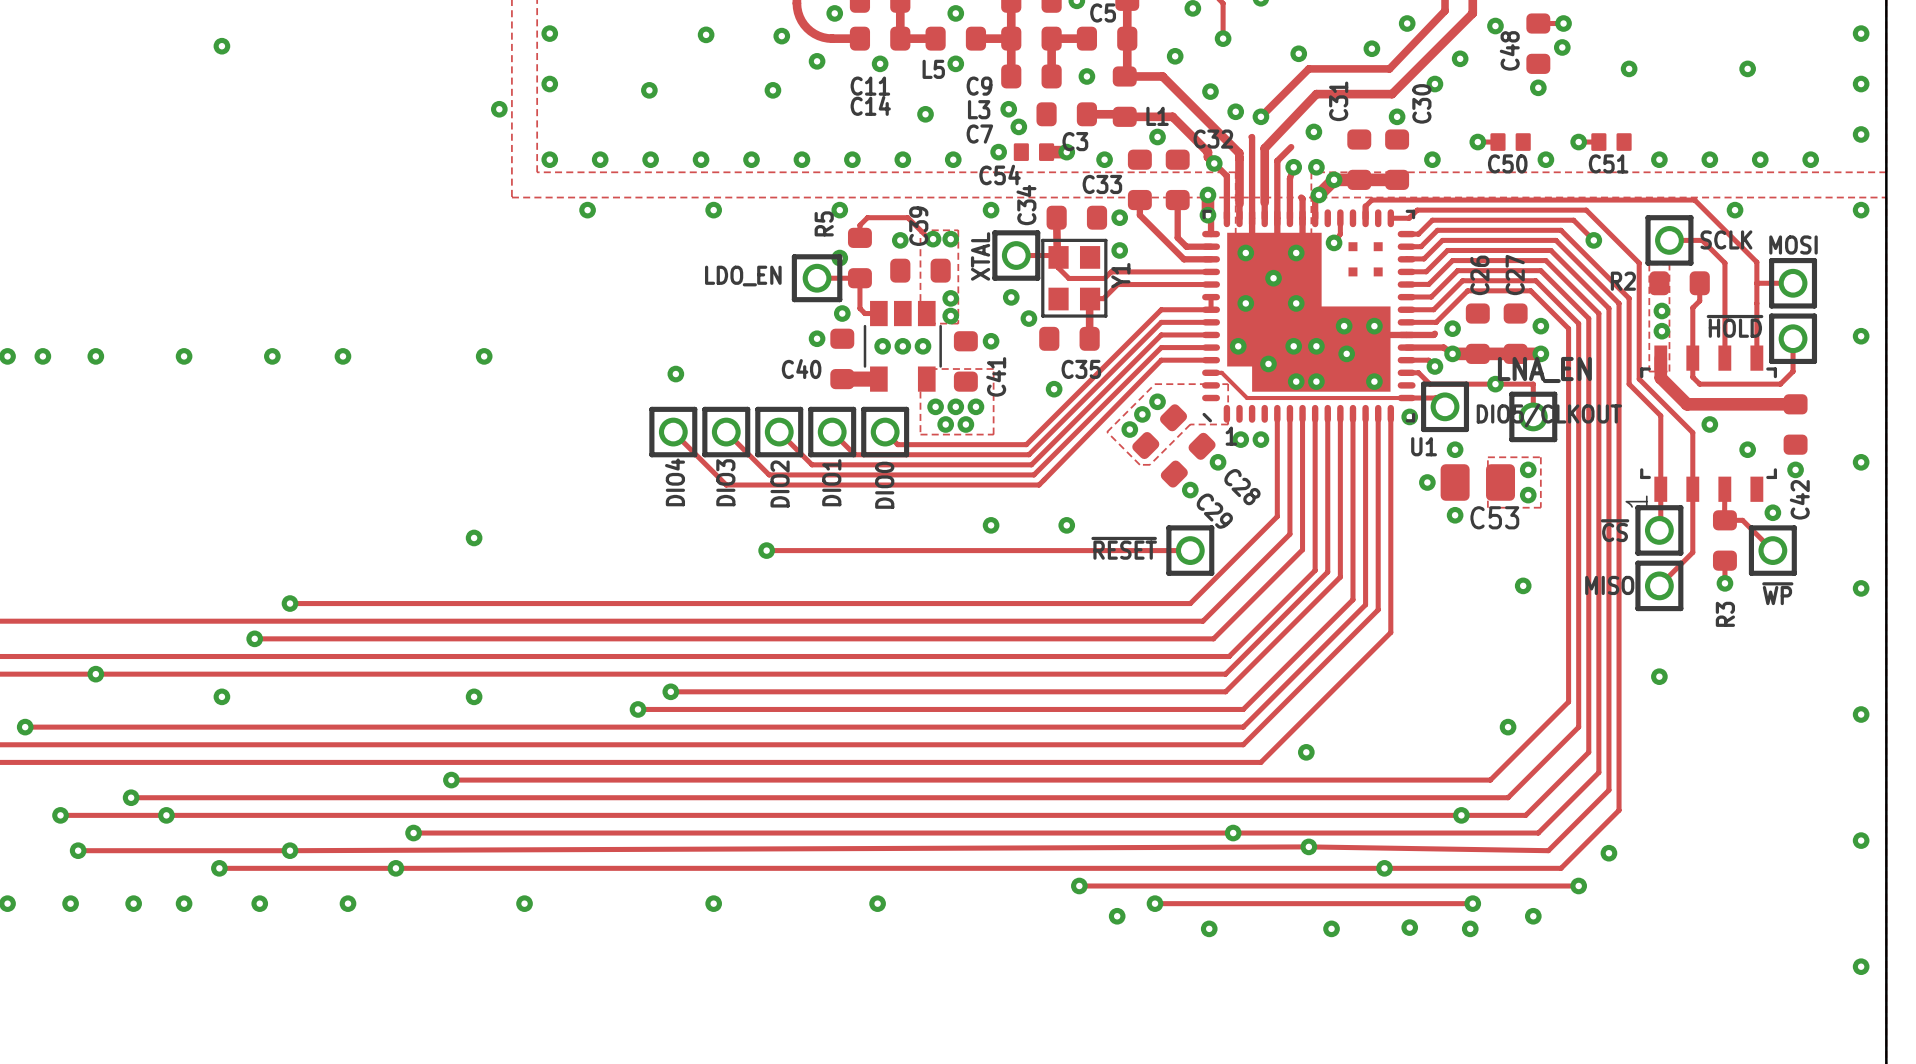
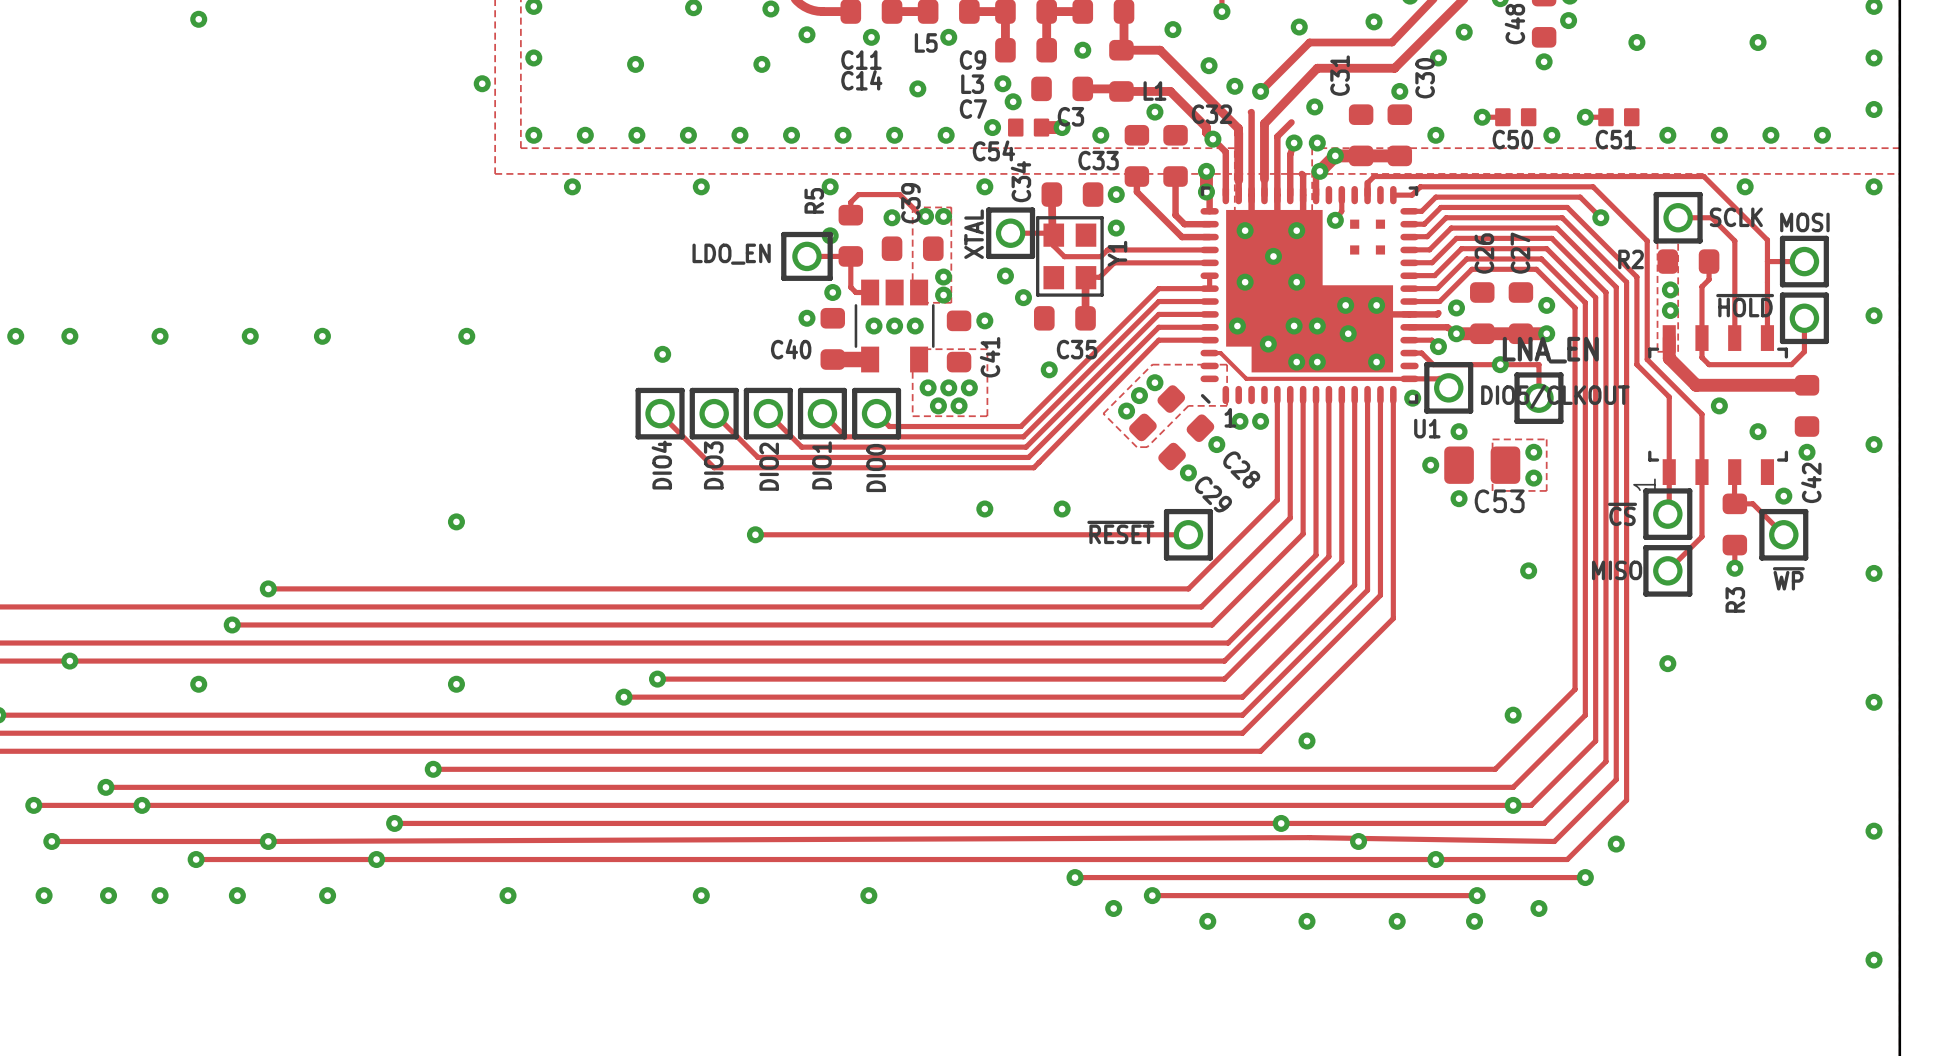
via: (1461, 815) -> none
via: none -> (1513, 805)
via: (1233, 833) -> none
via: none -> (1281, 823)
via: (1308, 846) -> none
via: none -> (1358, 841)
via: (1384, 868) -> none
via: none -> (1435, 859)
via position: (1409, 927) -> (1397, 921)
via position: (1331, 928) -> (1306, 921)

